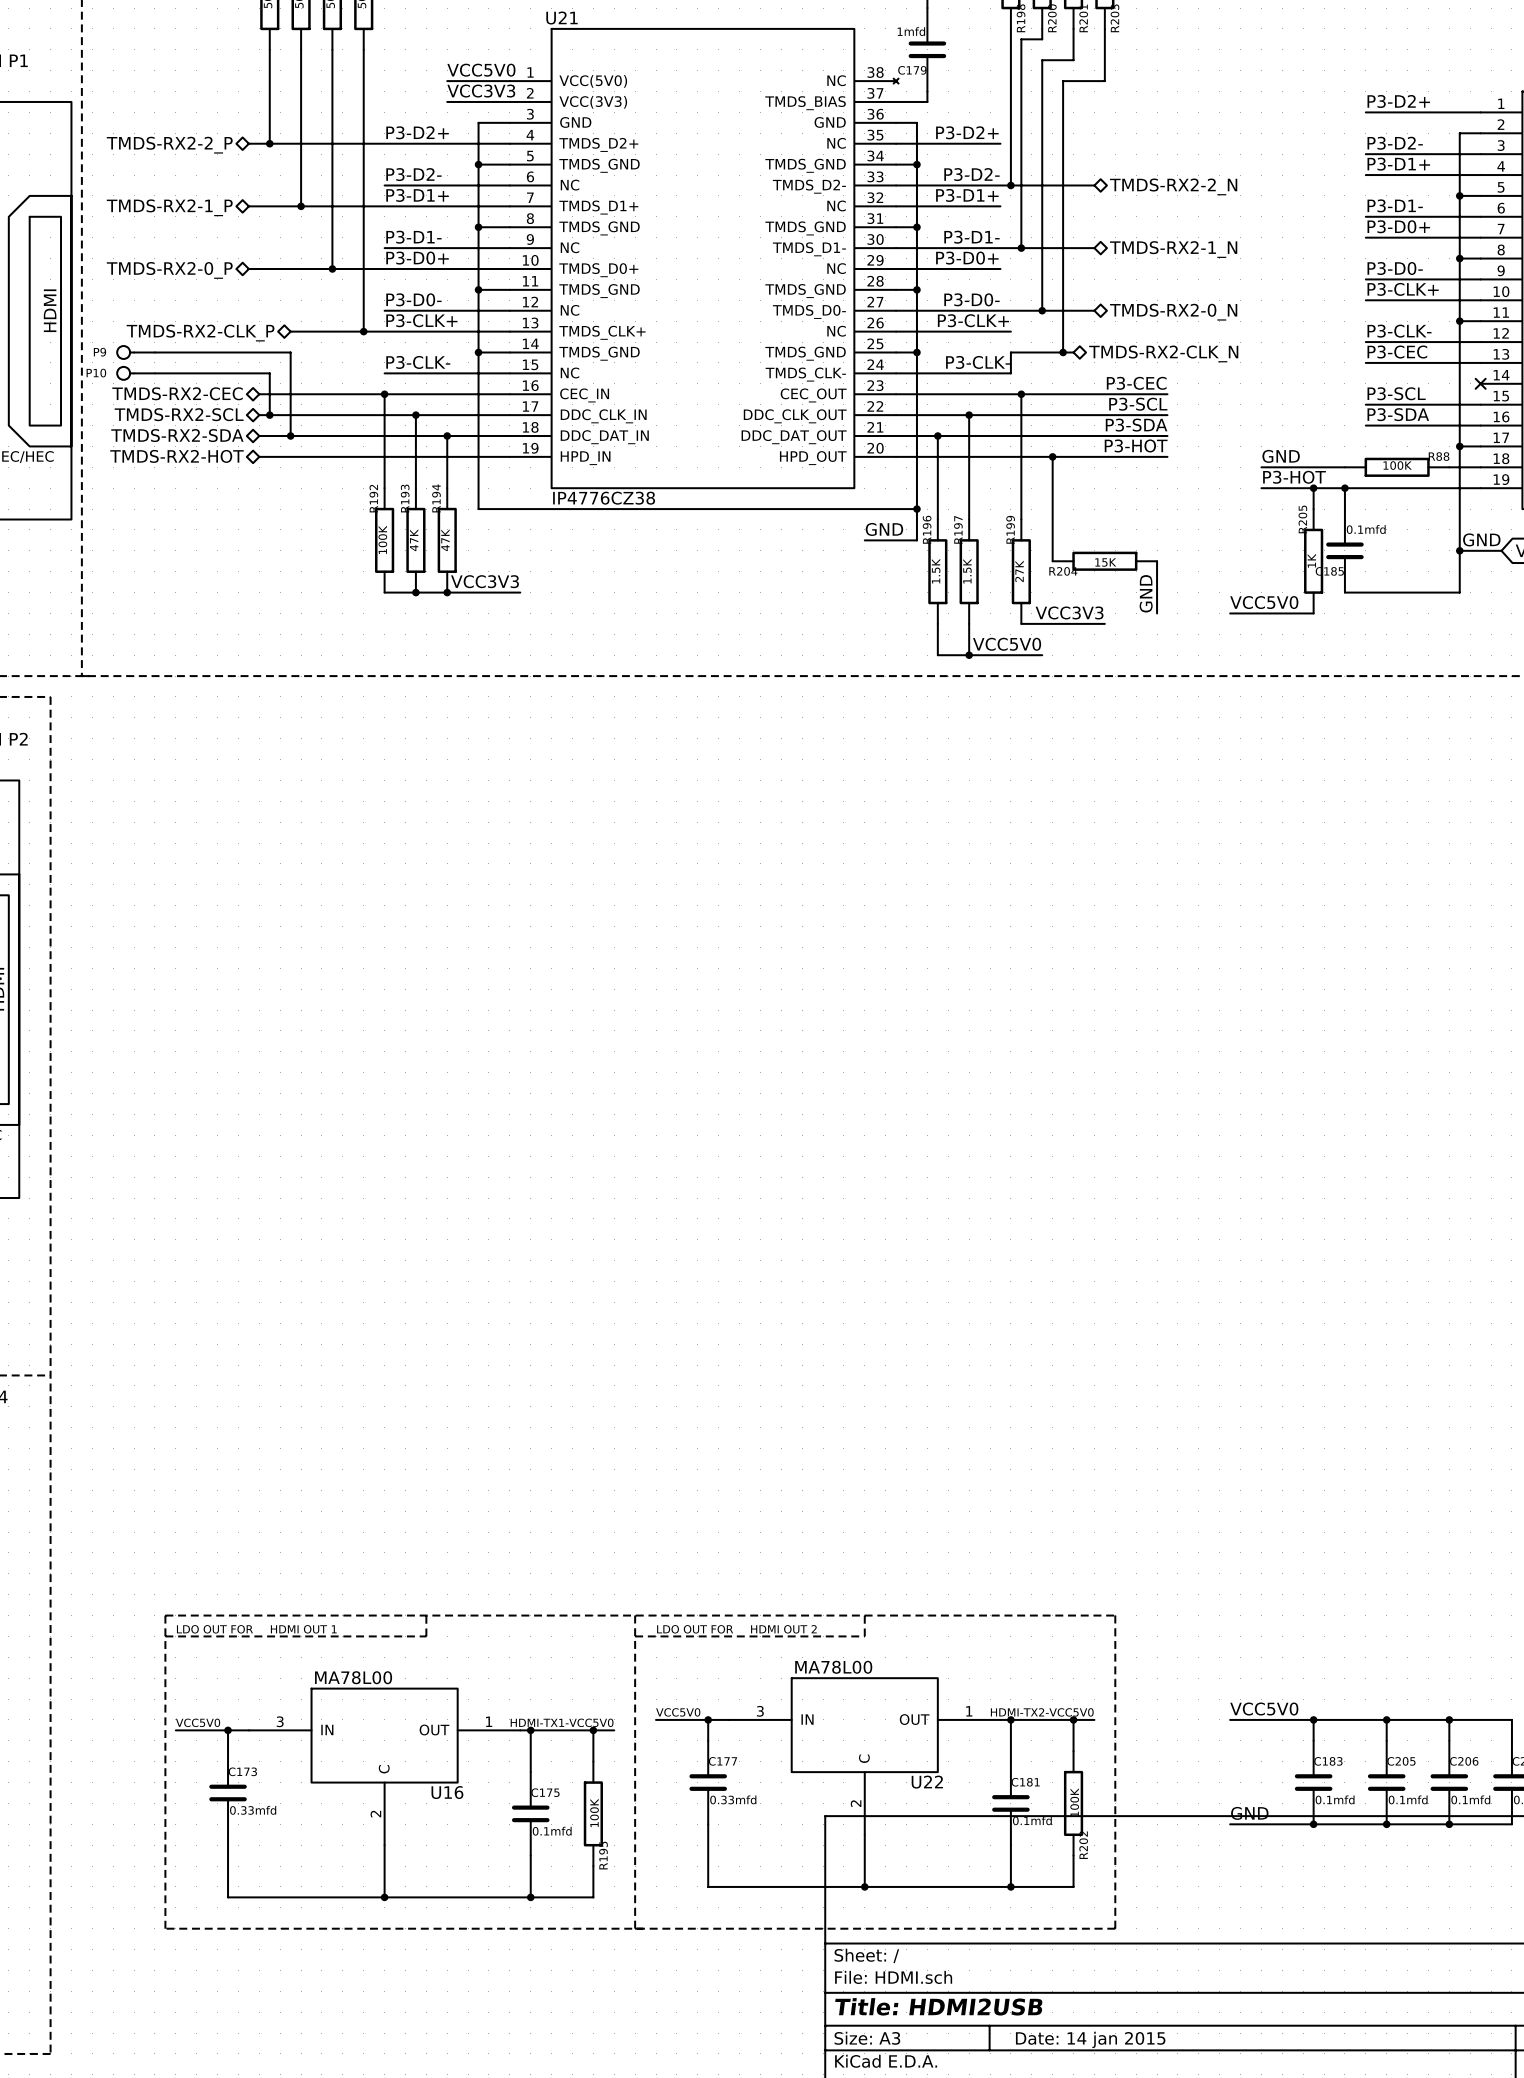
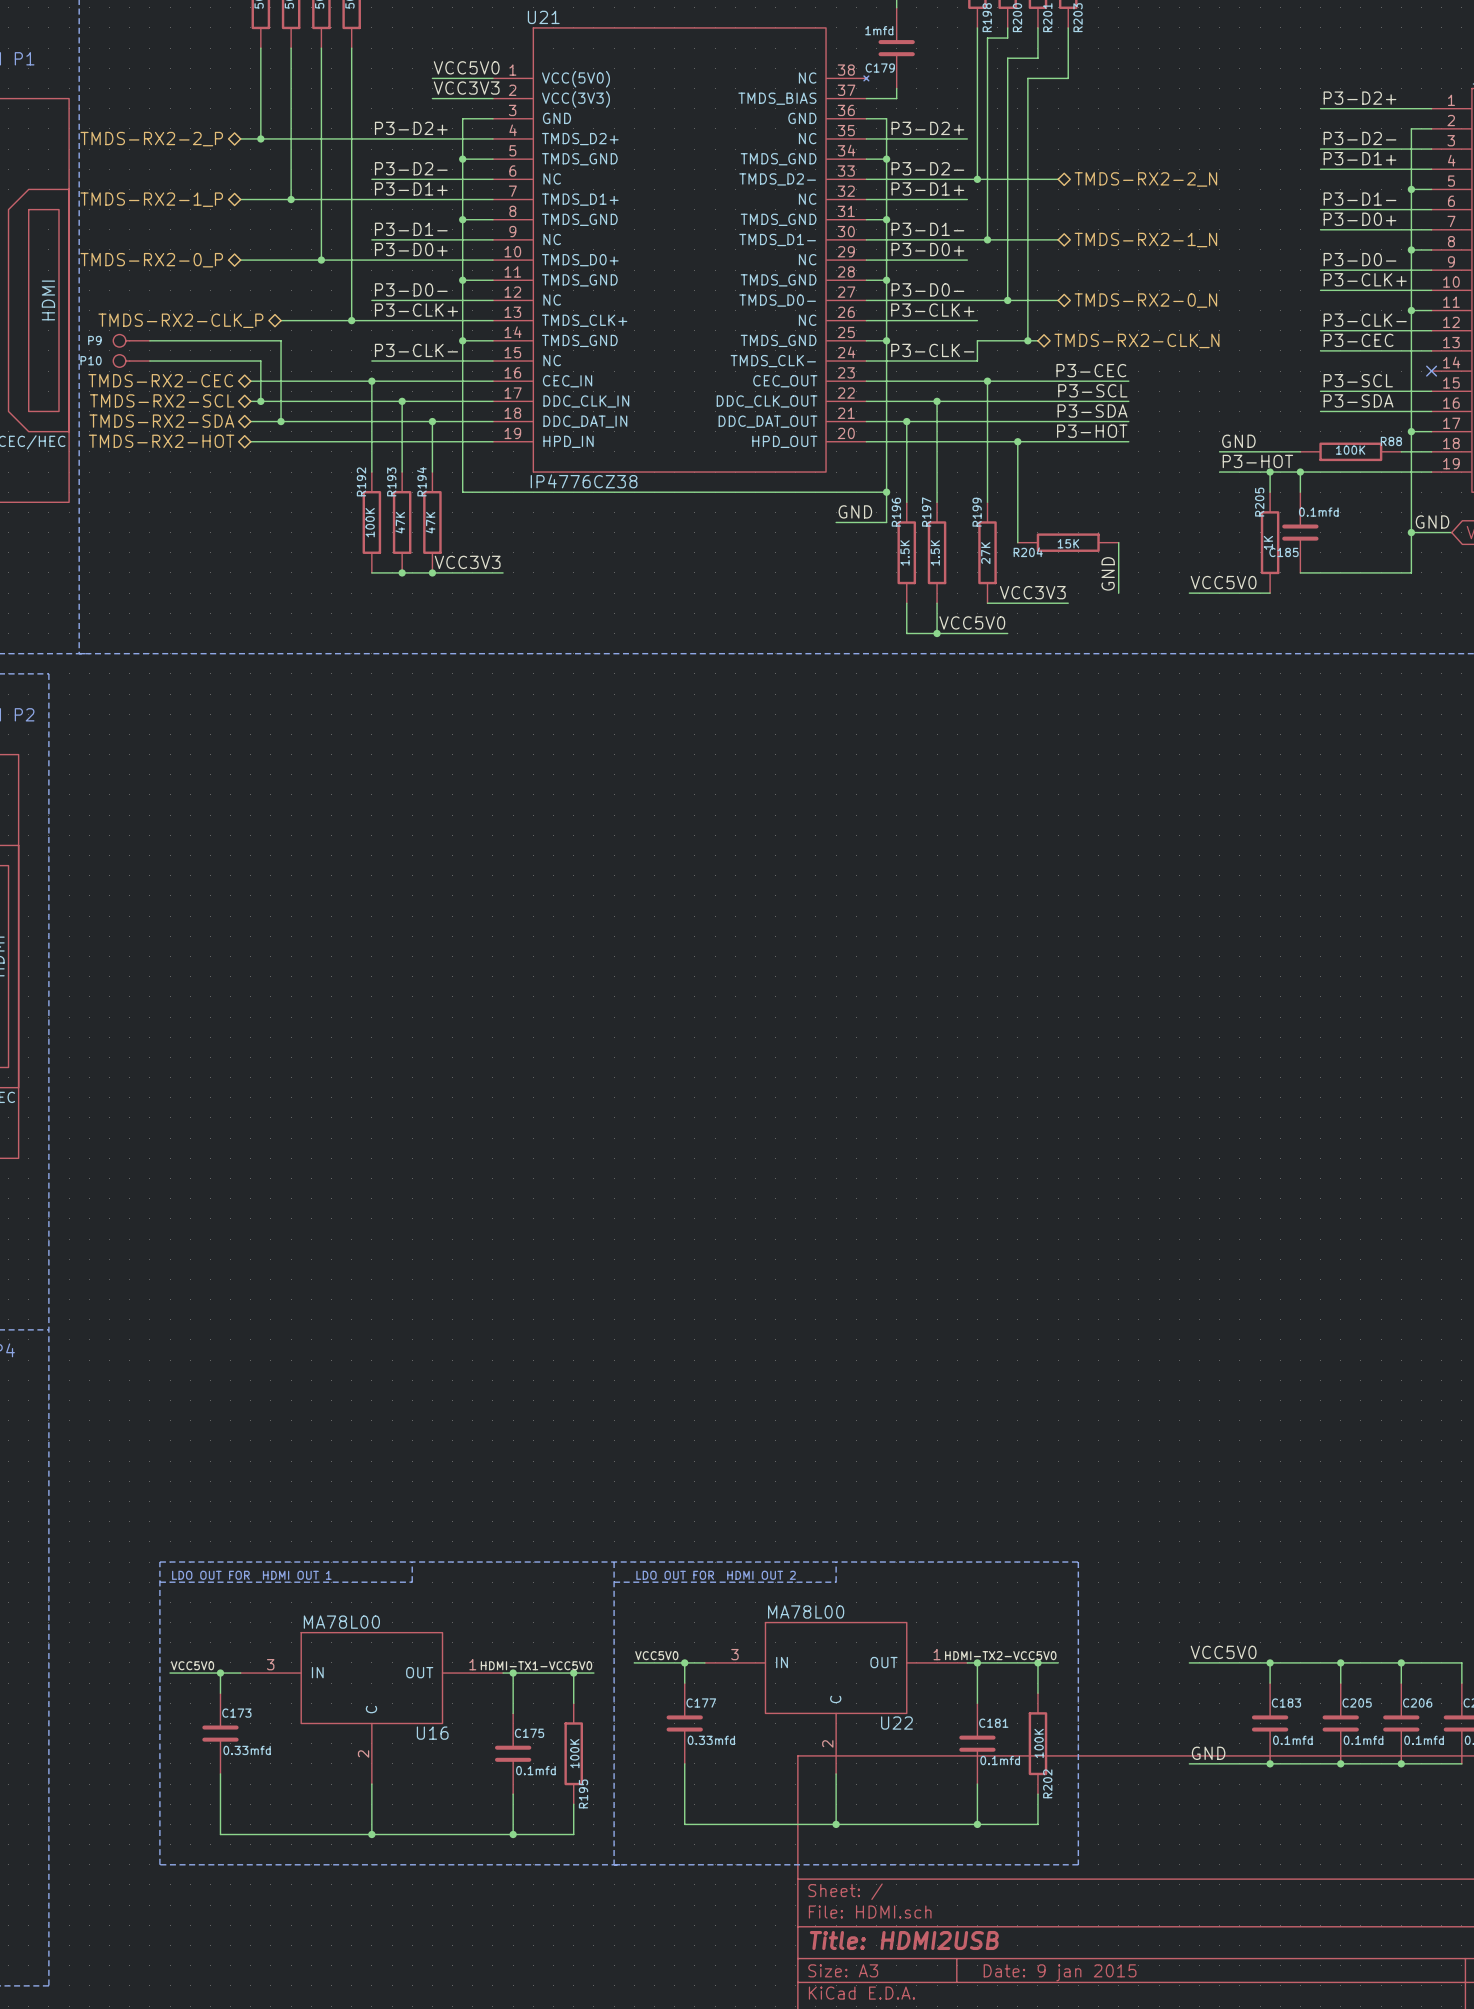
title block: Date: 14 jan 2015 (1090, 2039) -> Date: 9 jan 2015 (1060, 1972)

